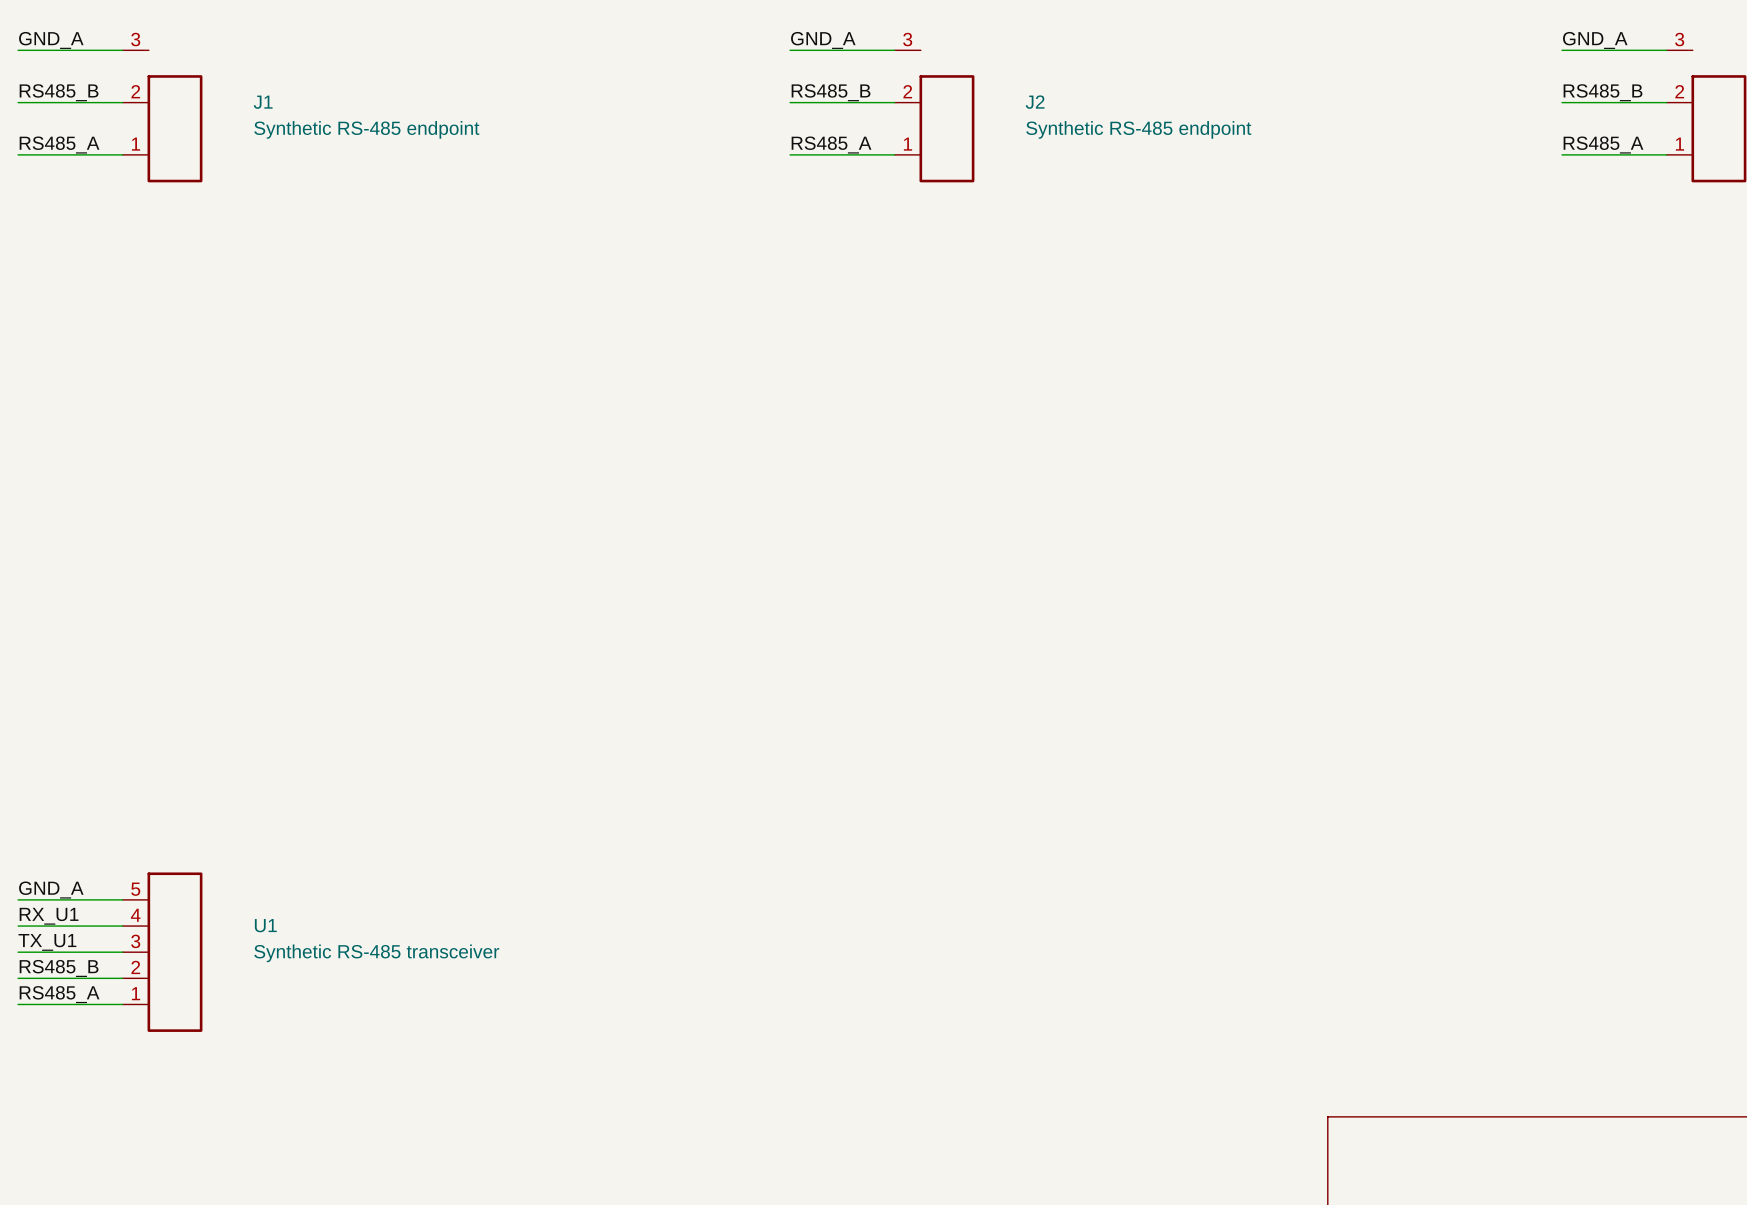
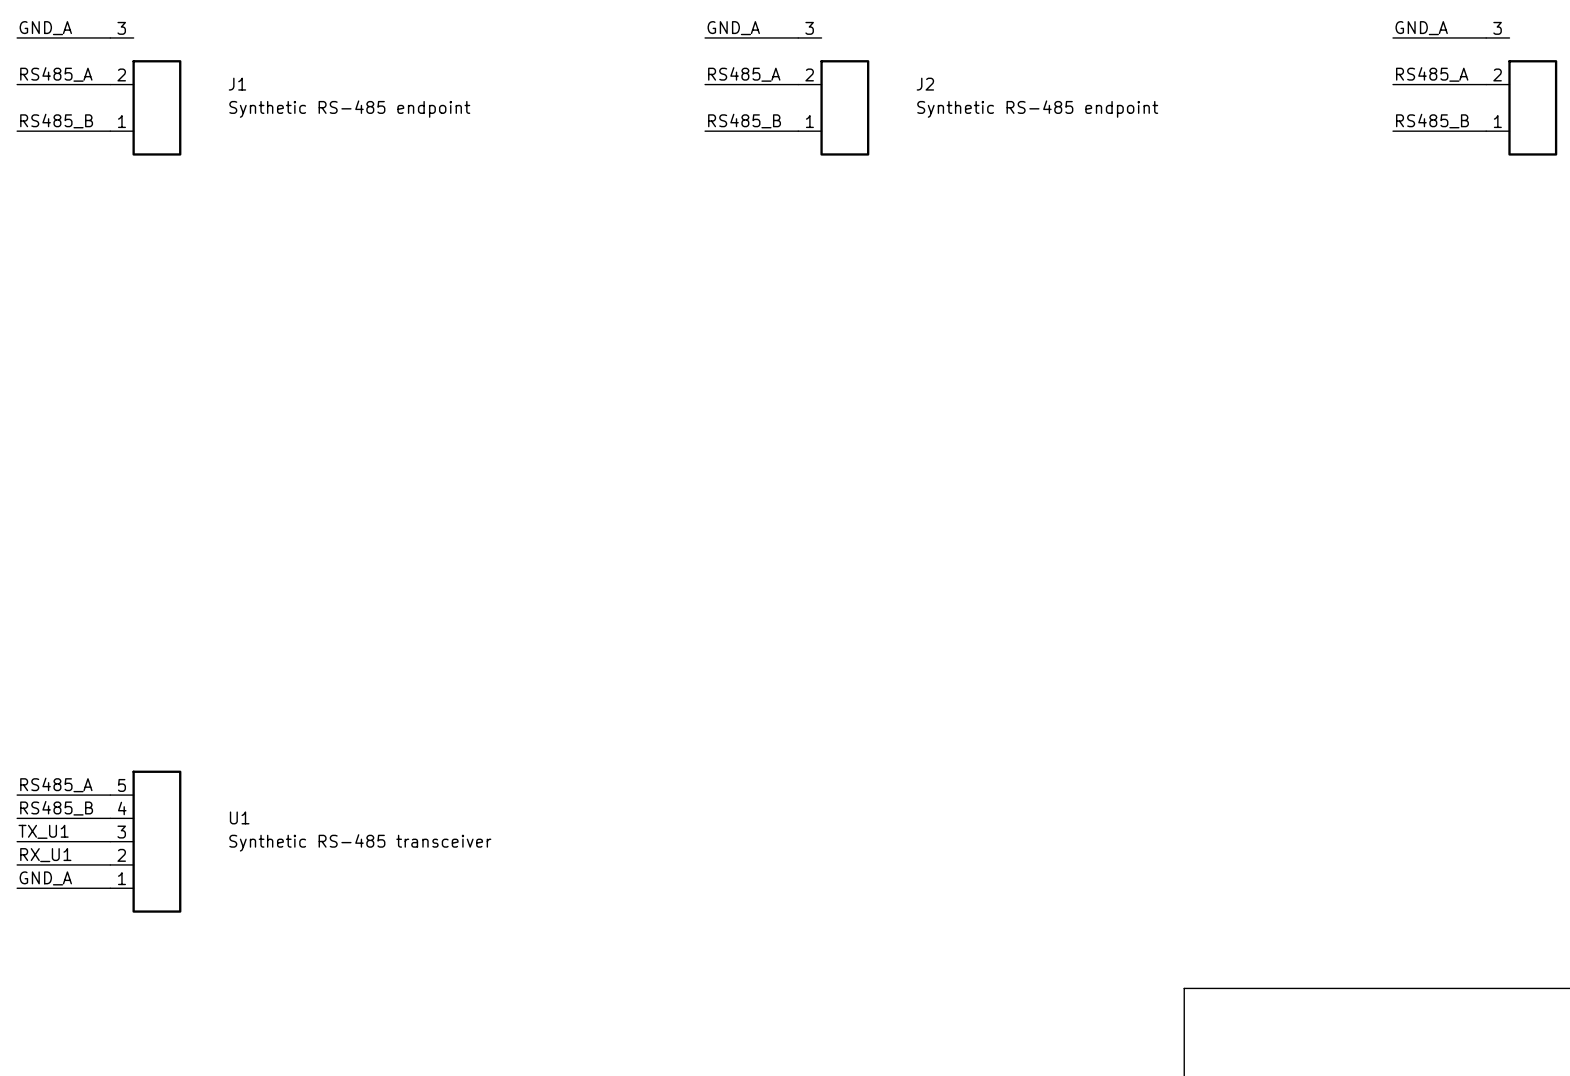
label: RS485_B (59, 92) -> RS485_A (56, 74)
label: RS485_B (831, 92) -> RS485_A (744, 74)
label: RS485_B (1603, 92) -> RS485_A (1432, 74)
label: RS485_A (59, 145) -> RS485_B (56, 121)
label: RS485_A (831, 145) -> RS485_B (744, 121)
label: RS485_A (1603, 145) -> RS485_B (1432, 121)
label: GND_A (51, 890) -> RS485_A (56, 784)
label: RX_U1 (49, 916) -> RS485_B (56, 808)
label: RS485_B (59, 968) -> RX_U1 (45, 855)
label: RS485_A (59, 994) -> GND_A (45, 878)

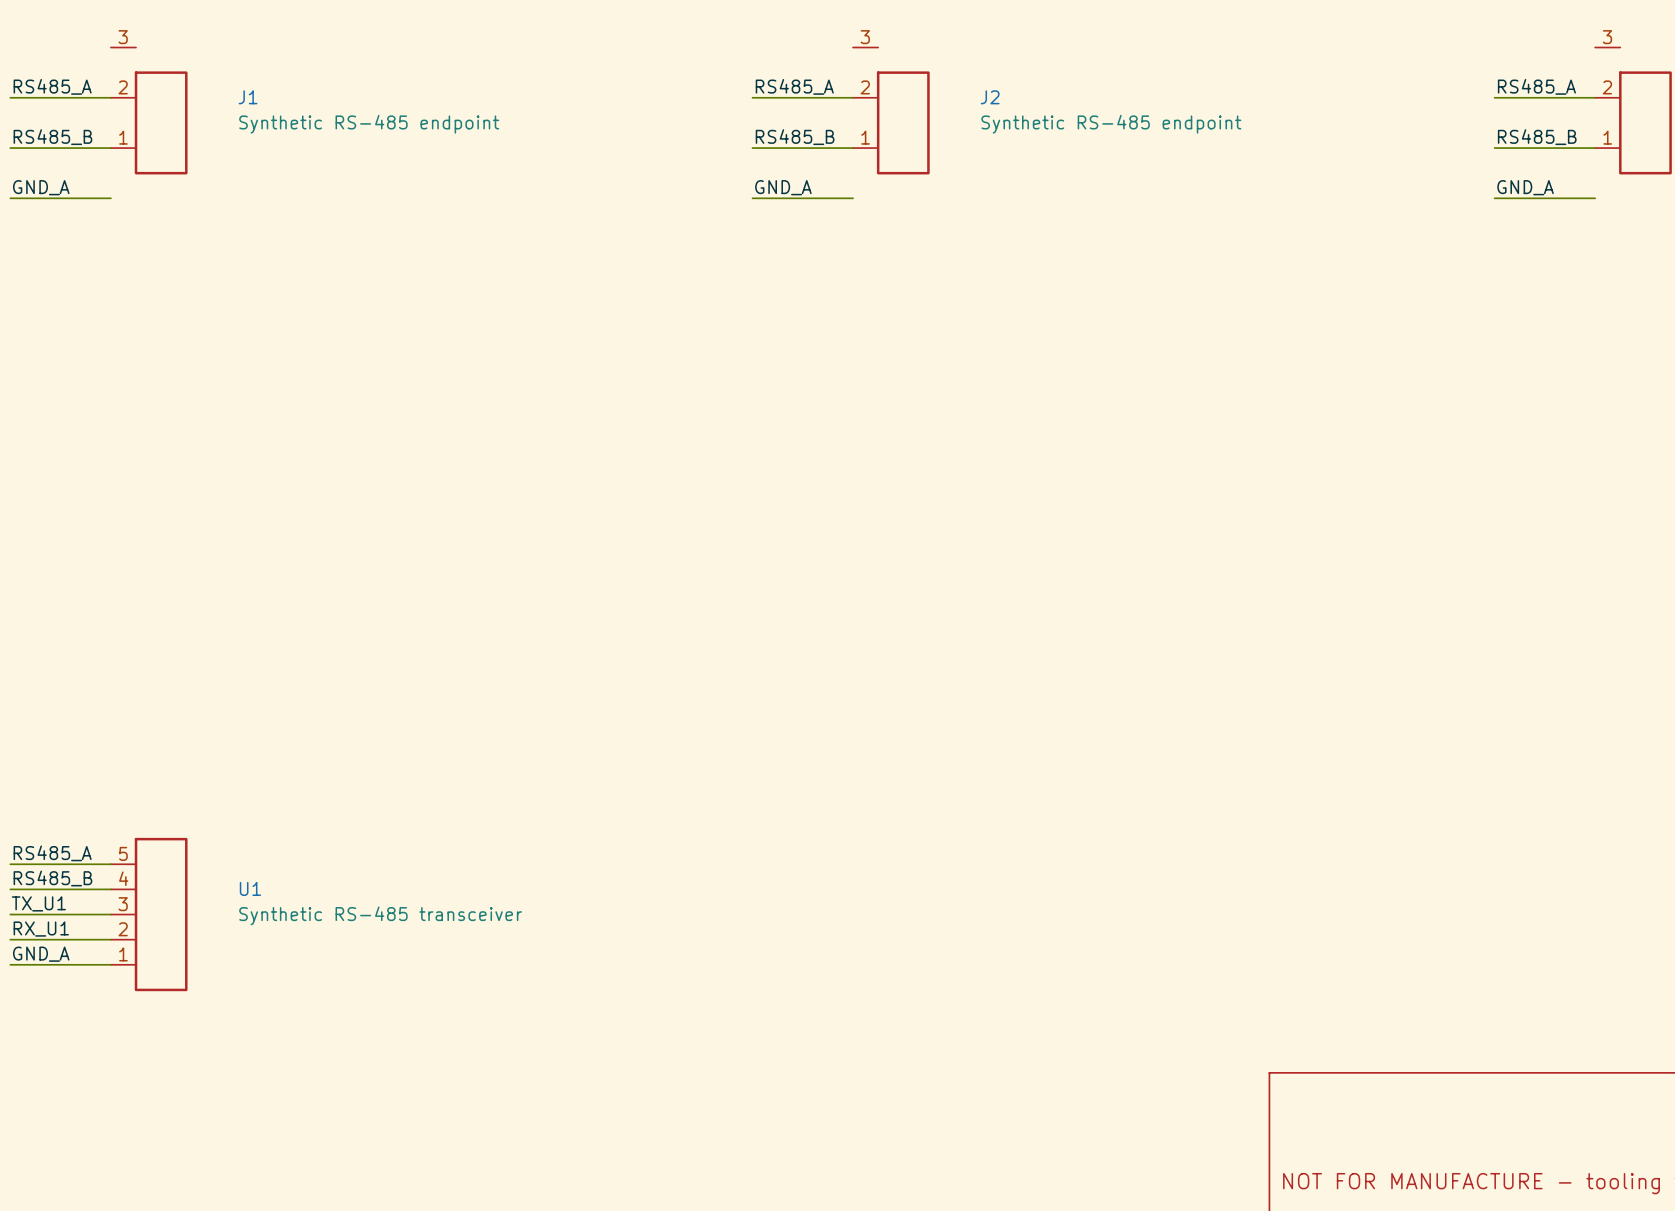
label position: GND_A (45, 28) -> GND_A (41, 187)
label position: GND_A (733, 28) -> GND_A (783, 187)
label position: GND_A (1421, 28) -> GND_A (1525, 187)
wire: (17, 37) (110, 37) -> (10, 198) (110, 198)
wire: (705, 37) (798, 37) -> (752, 198) (853, 198)
wire: (1393, 37) (1486, 37) -> (1494, 198) (1595, 198)

